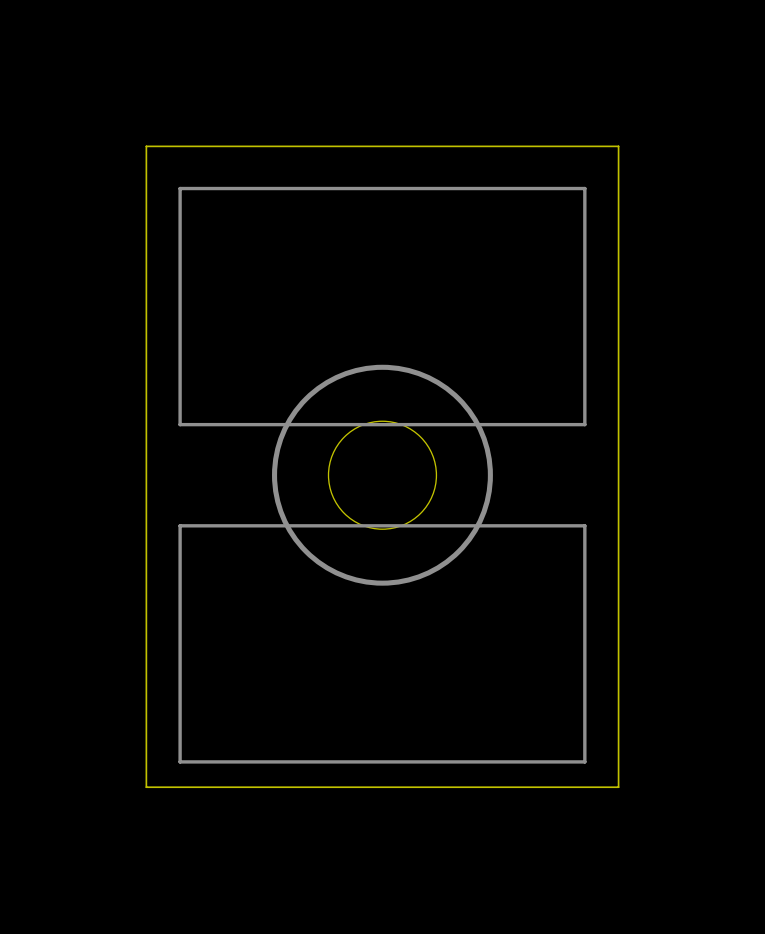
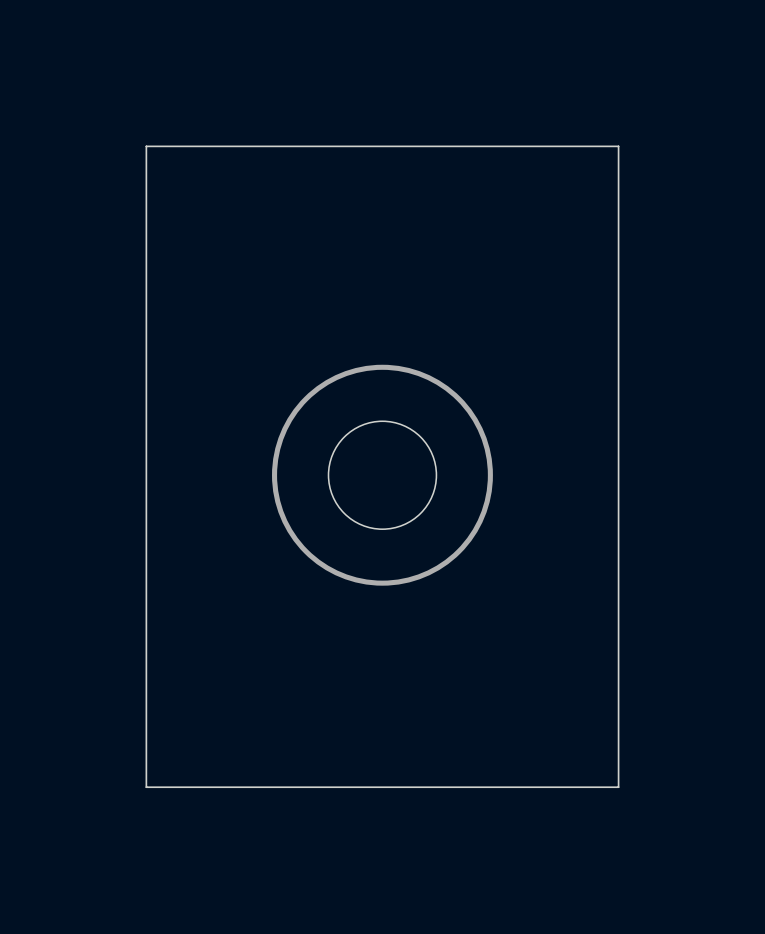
line: (180, 188) (180, 424) (584, 424) (584, 188) (180, 188) -> none
line: (180, 525) (584, 525) (584, 761) (180, 761) (180, 525) -> none

